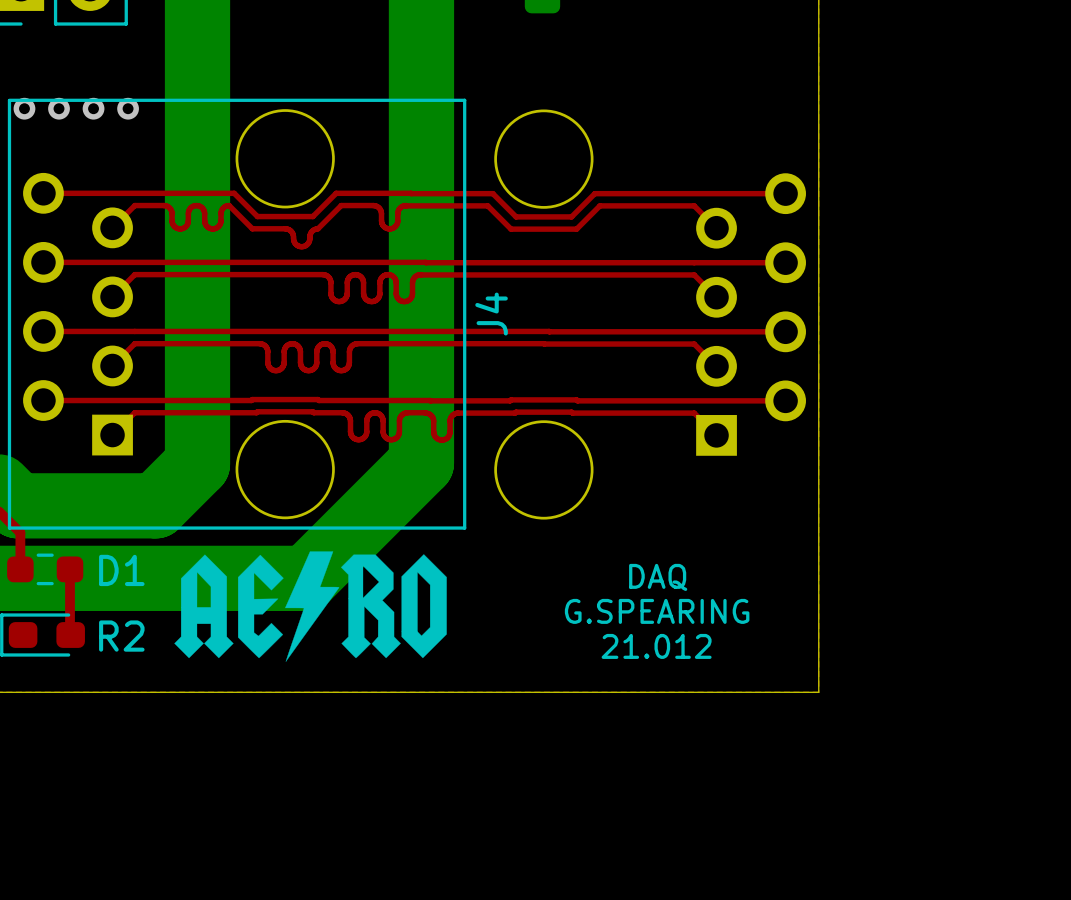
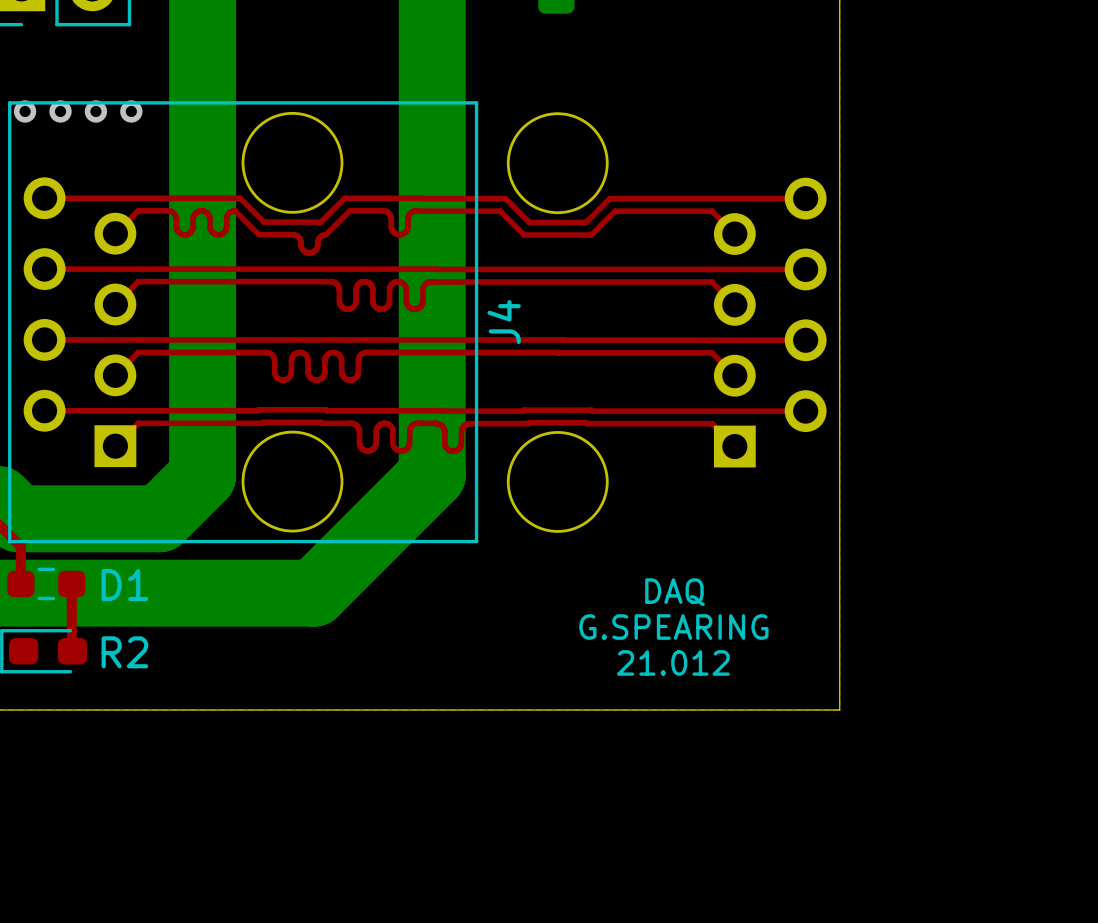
drawing: [174, 551, 447, 662] -> none

